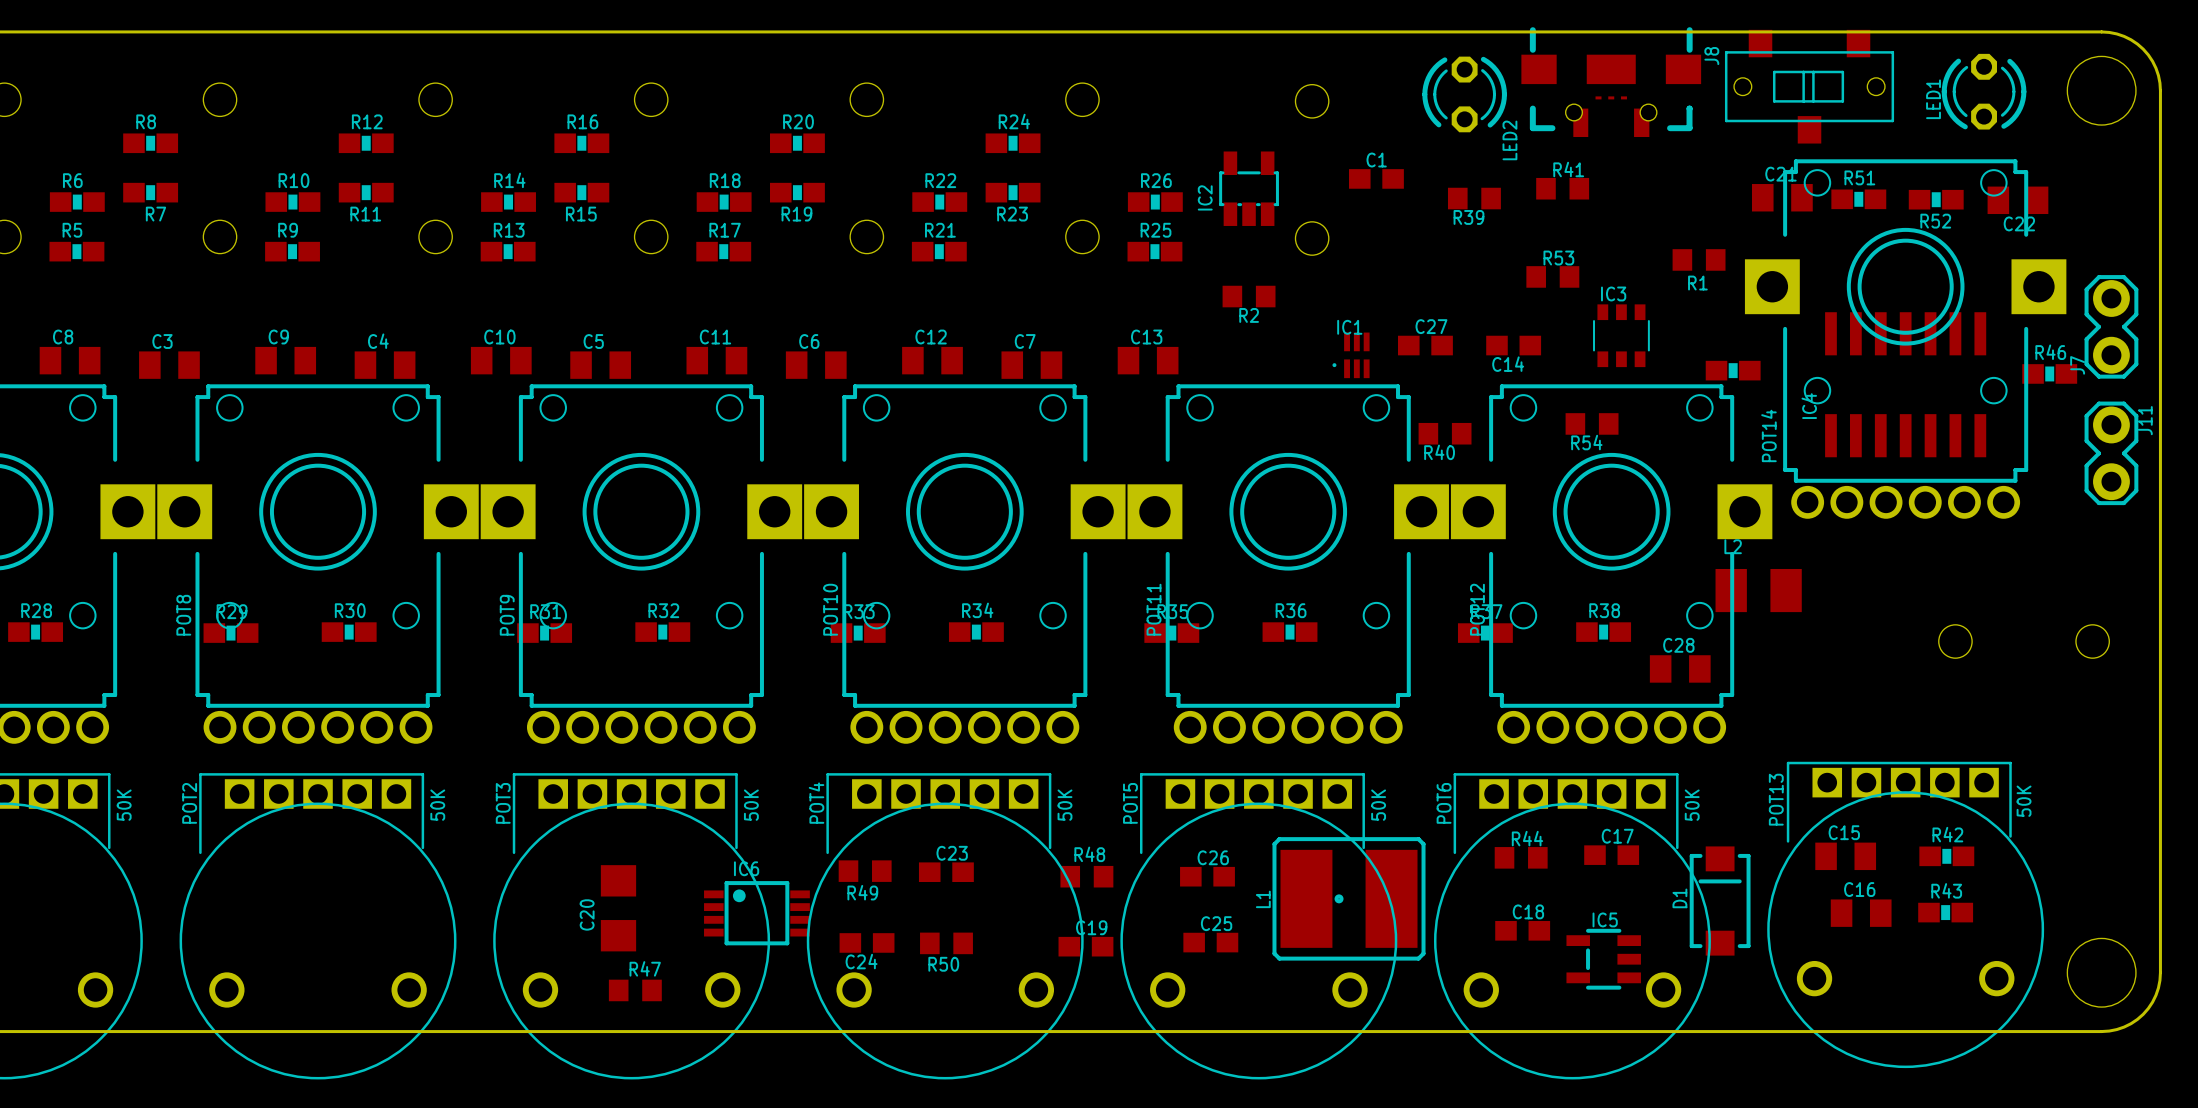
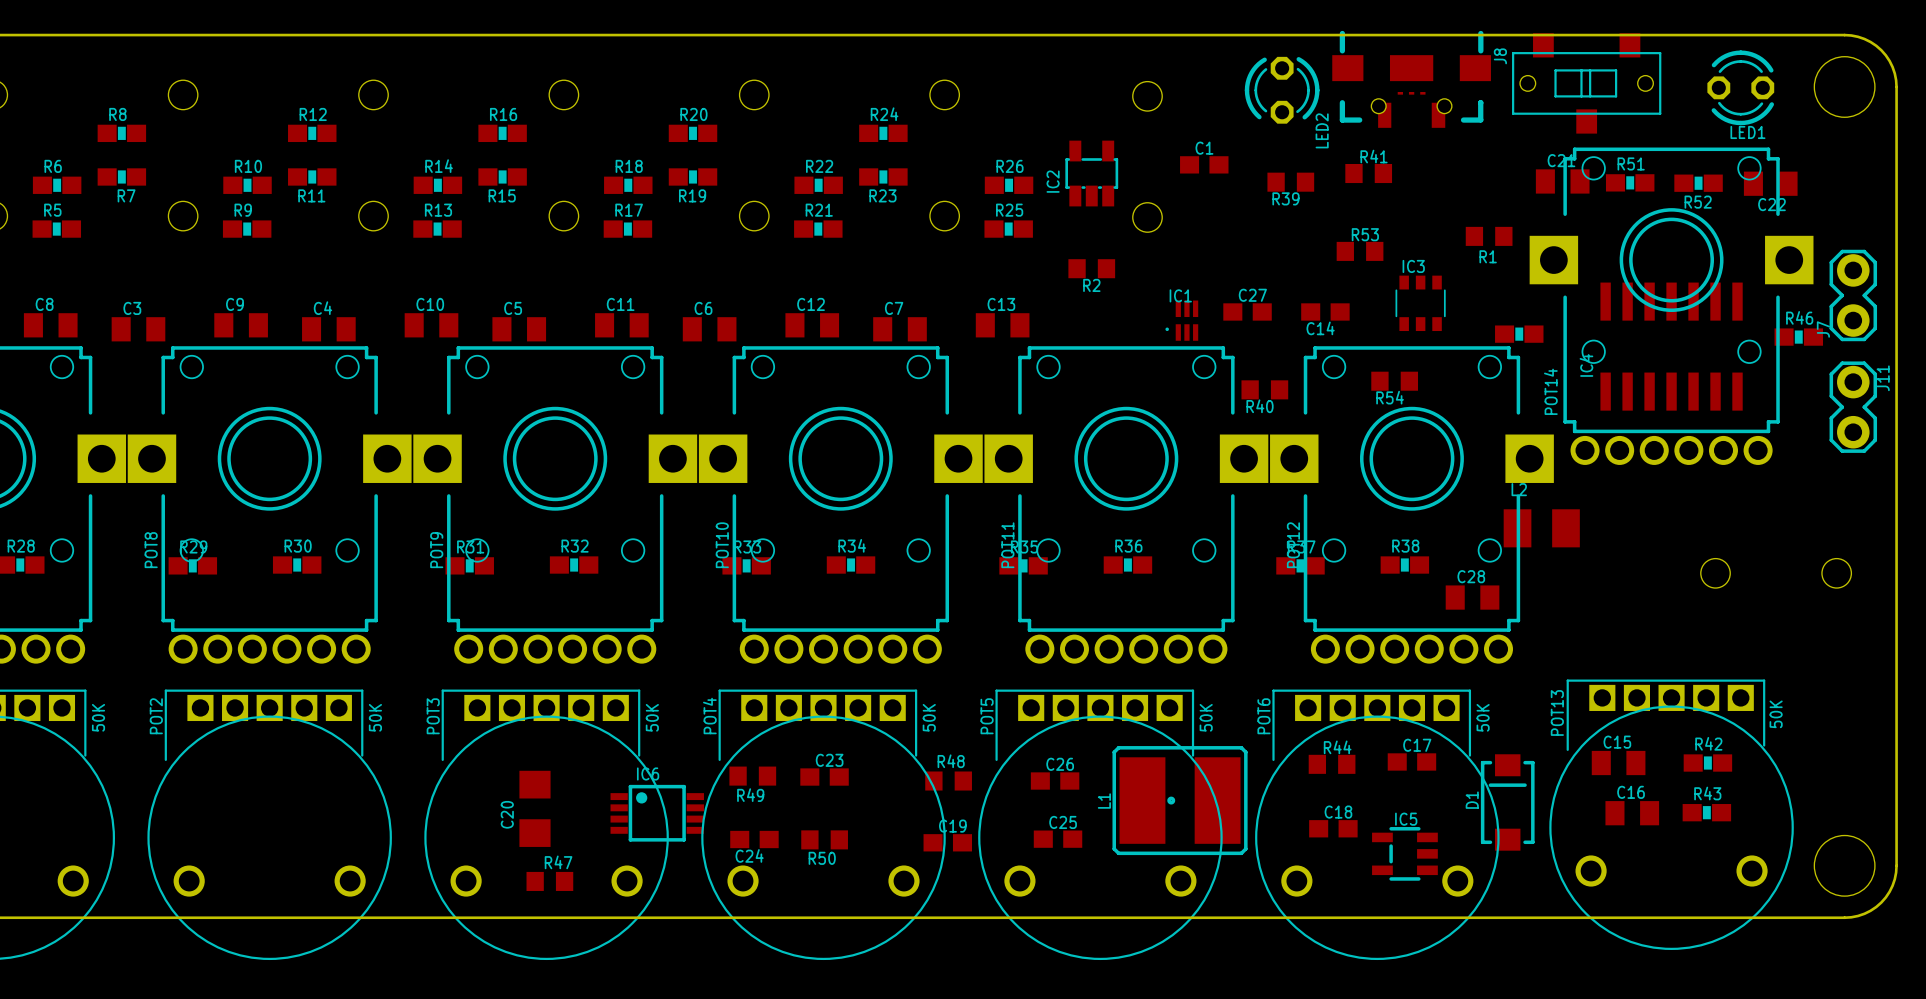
LED1 rotation: 0° (1984, 91) -> 90° counterclockwise (1740, 87)

